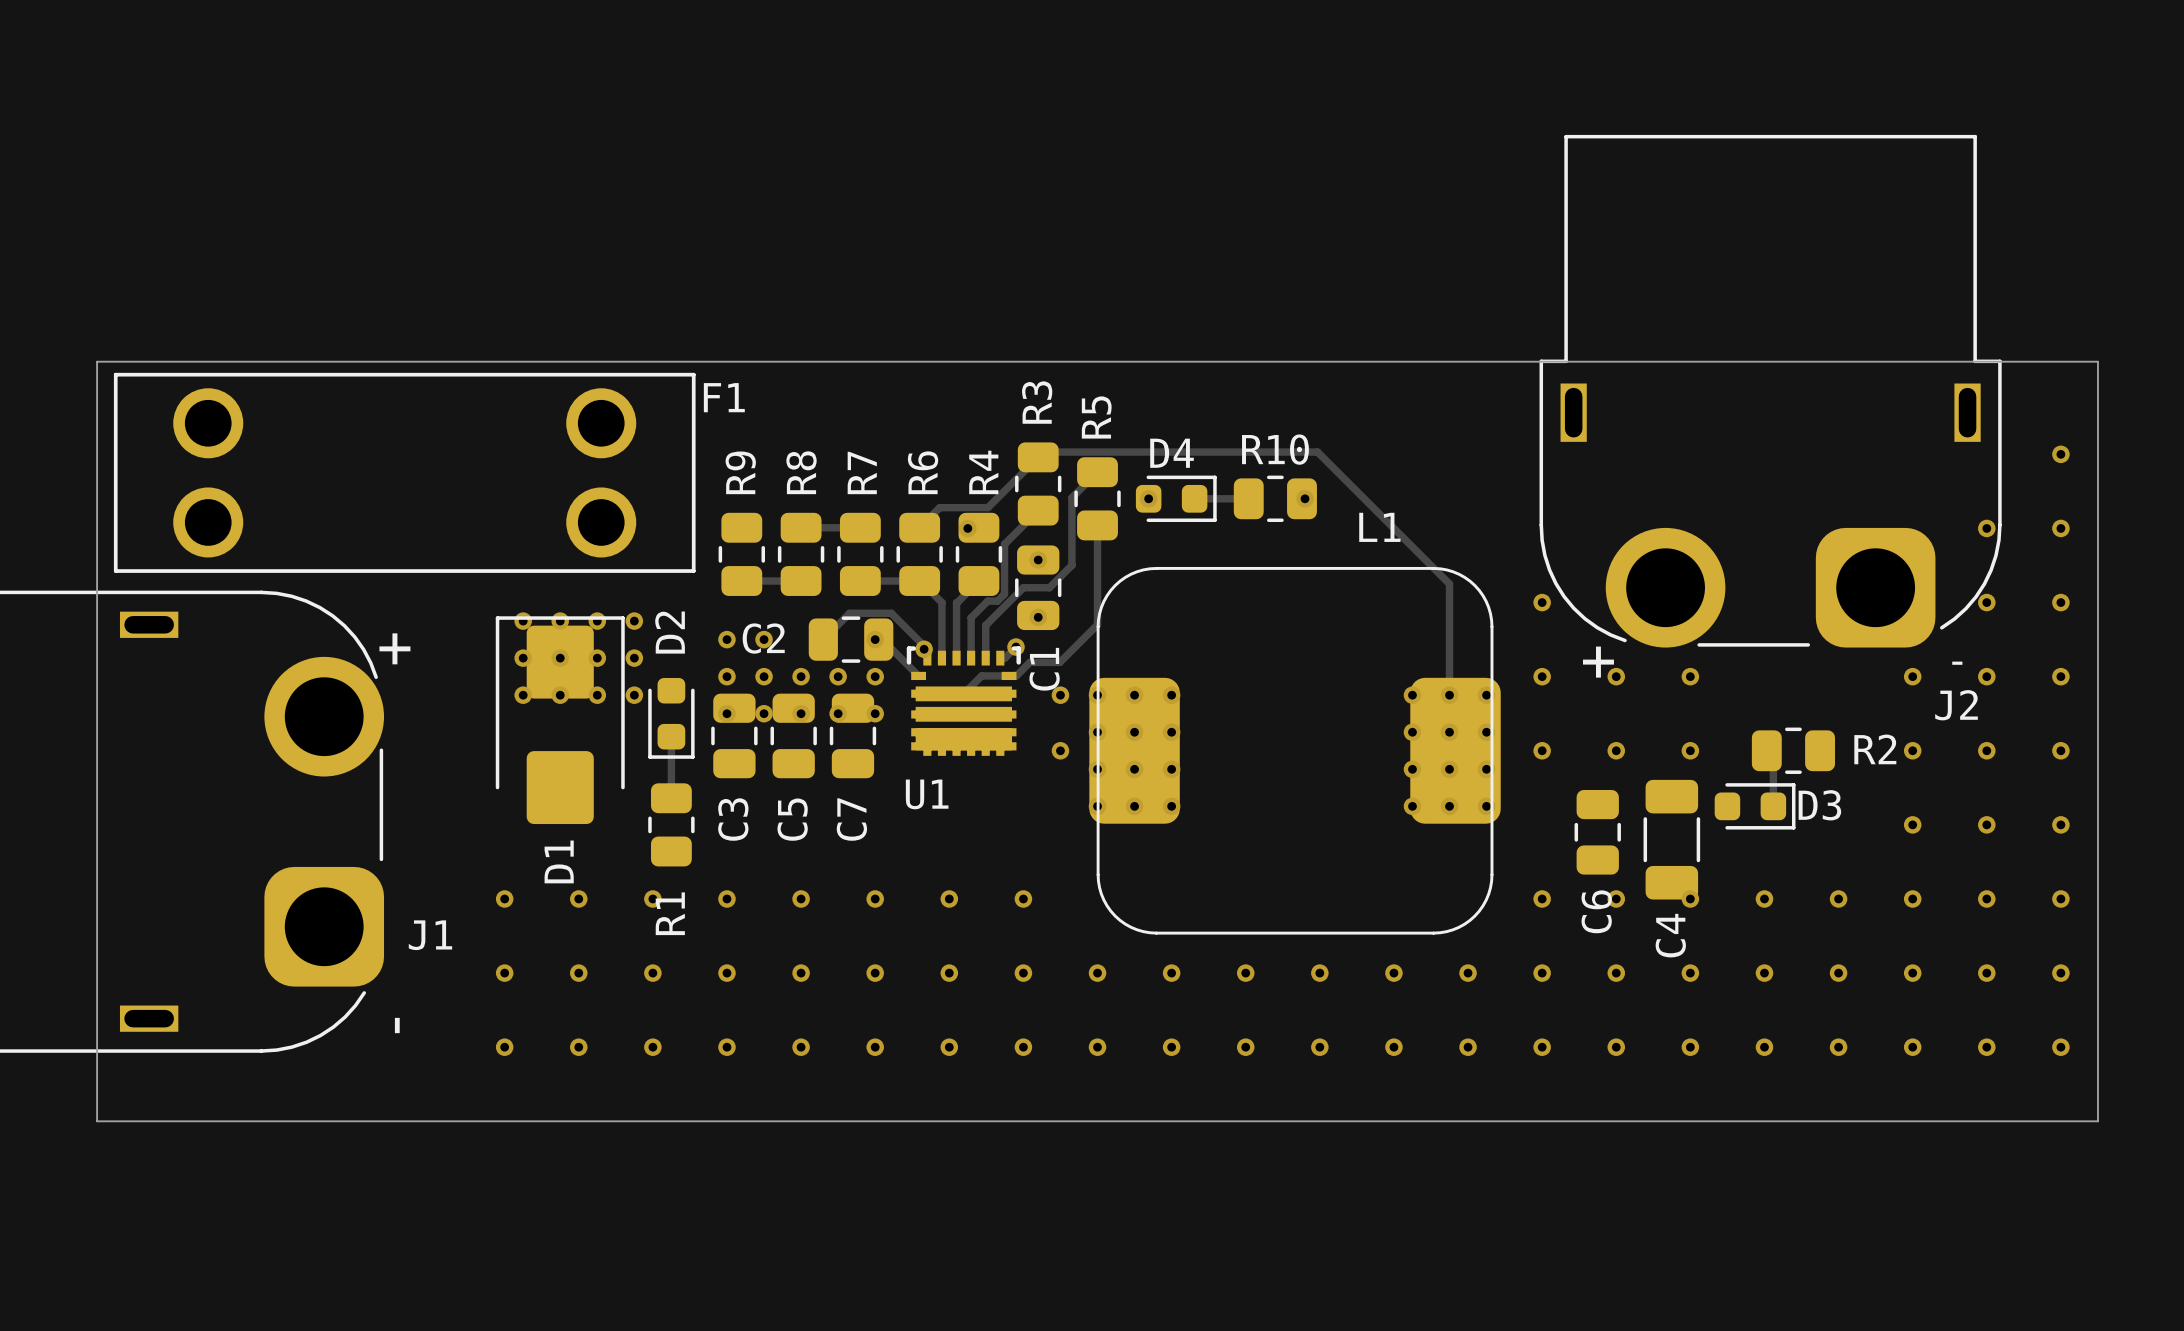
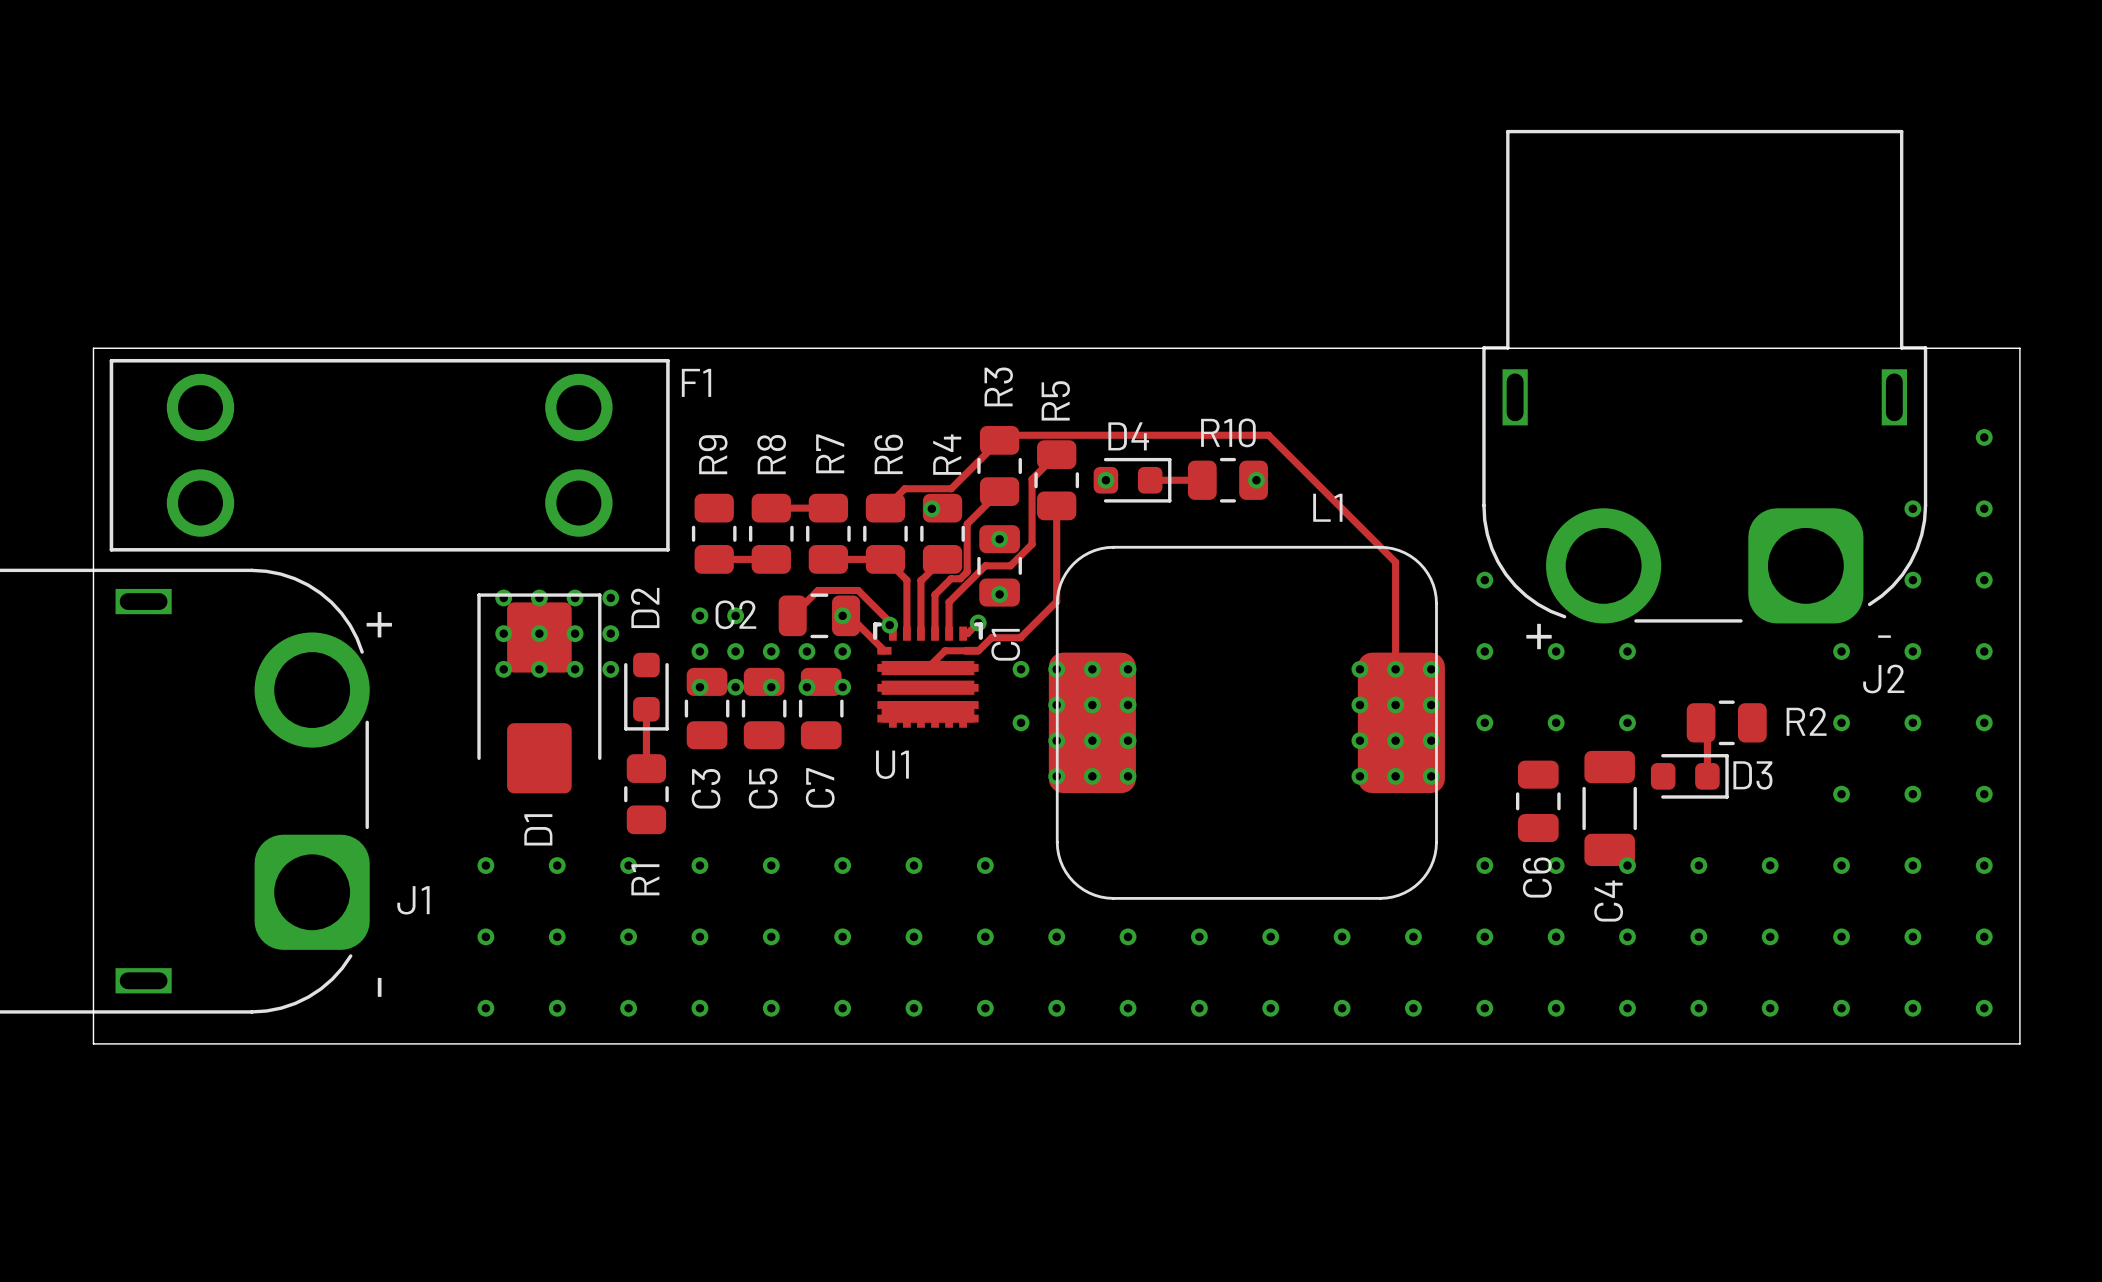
board edge: (97, 1084) (97, 1121) (2097, 1121) (2097, 1084) -> (93, 1043) (2019, 1043)

